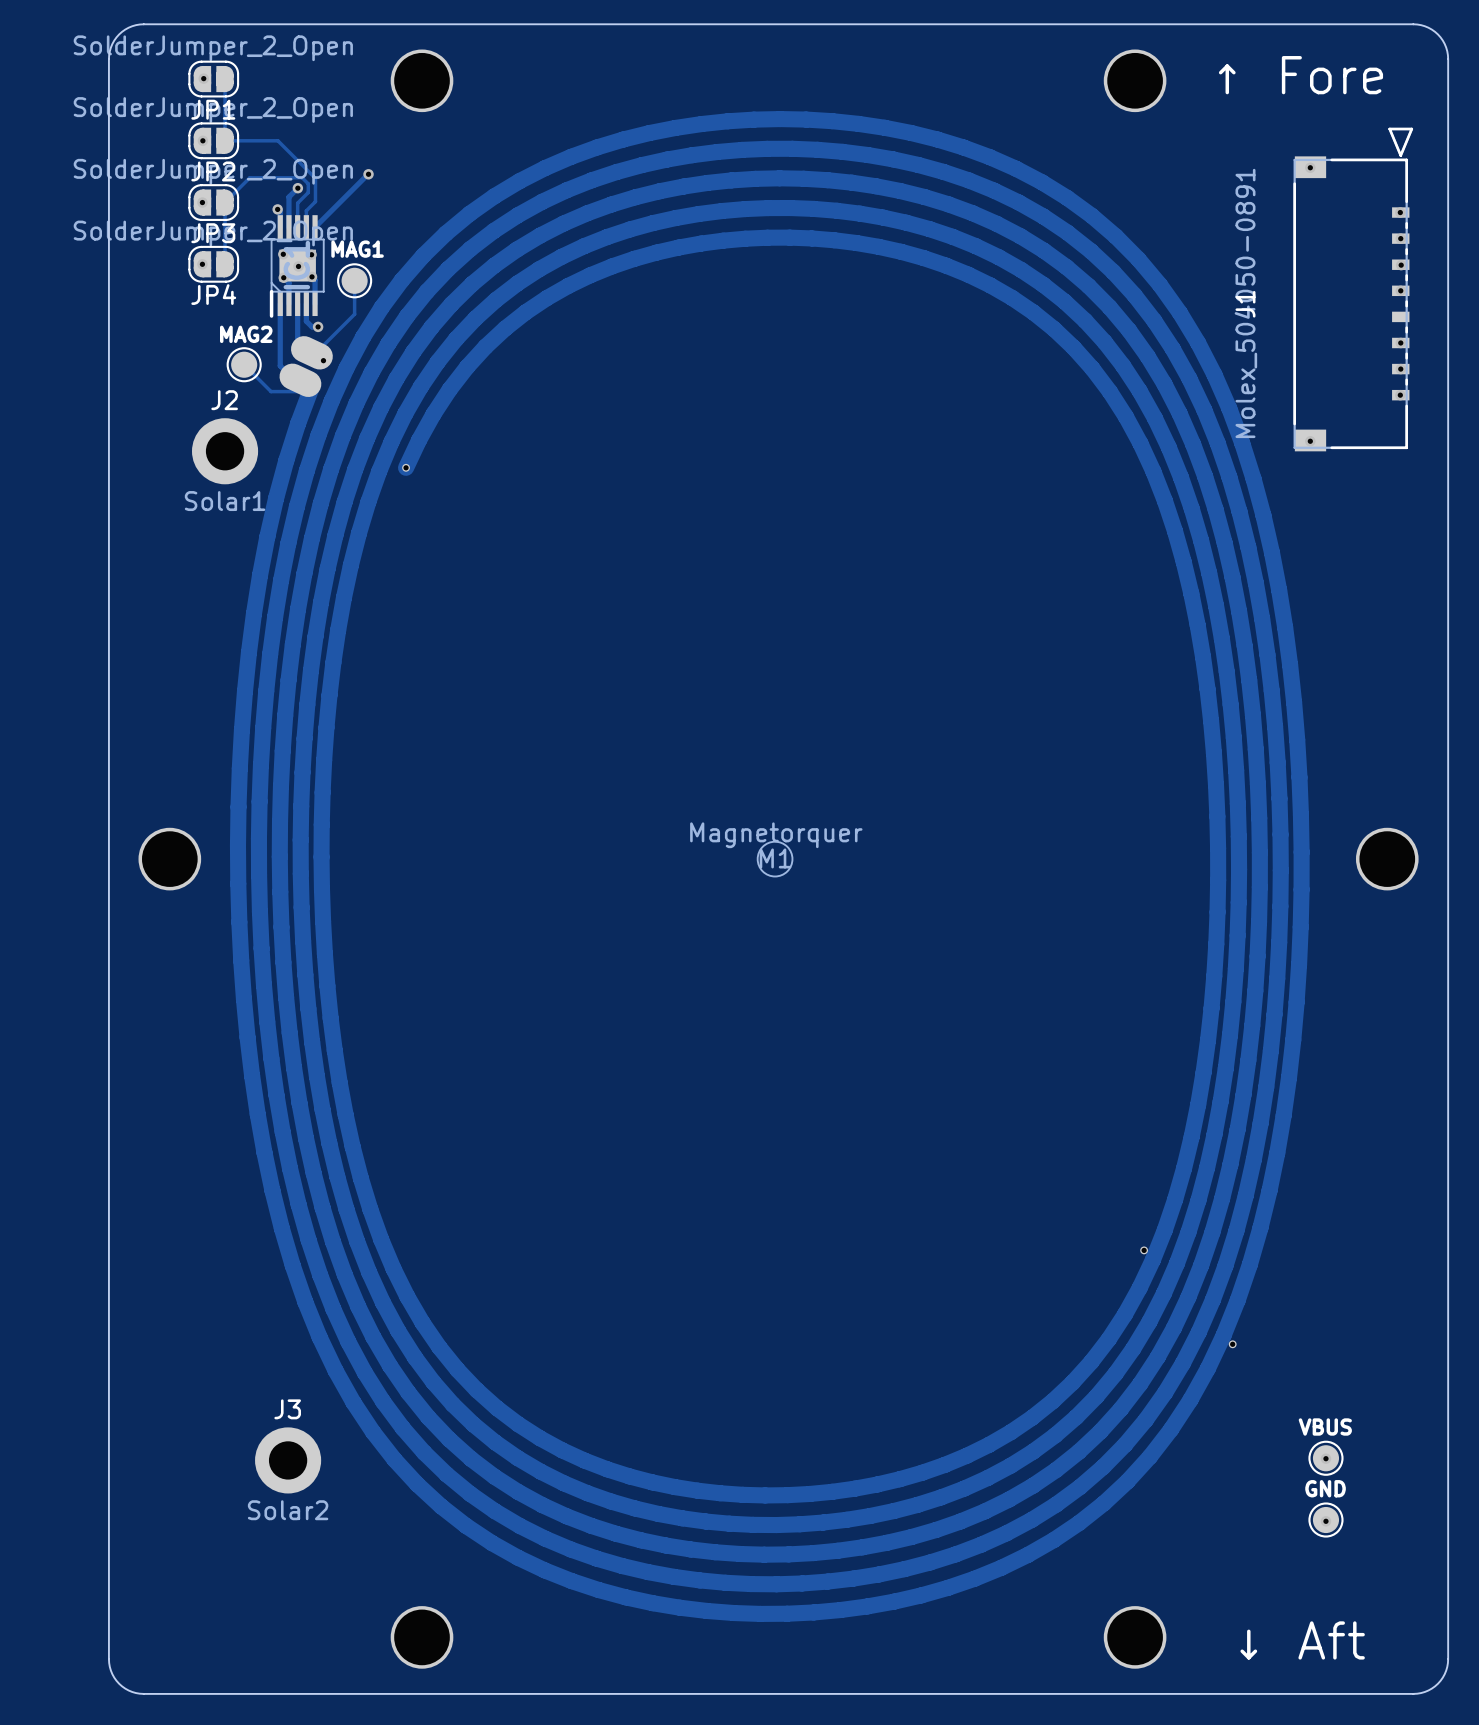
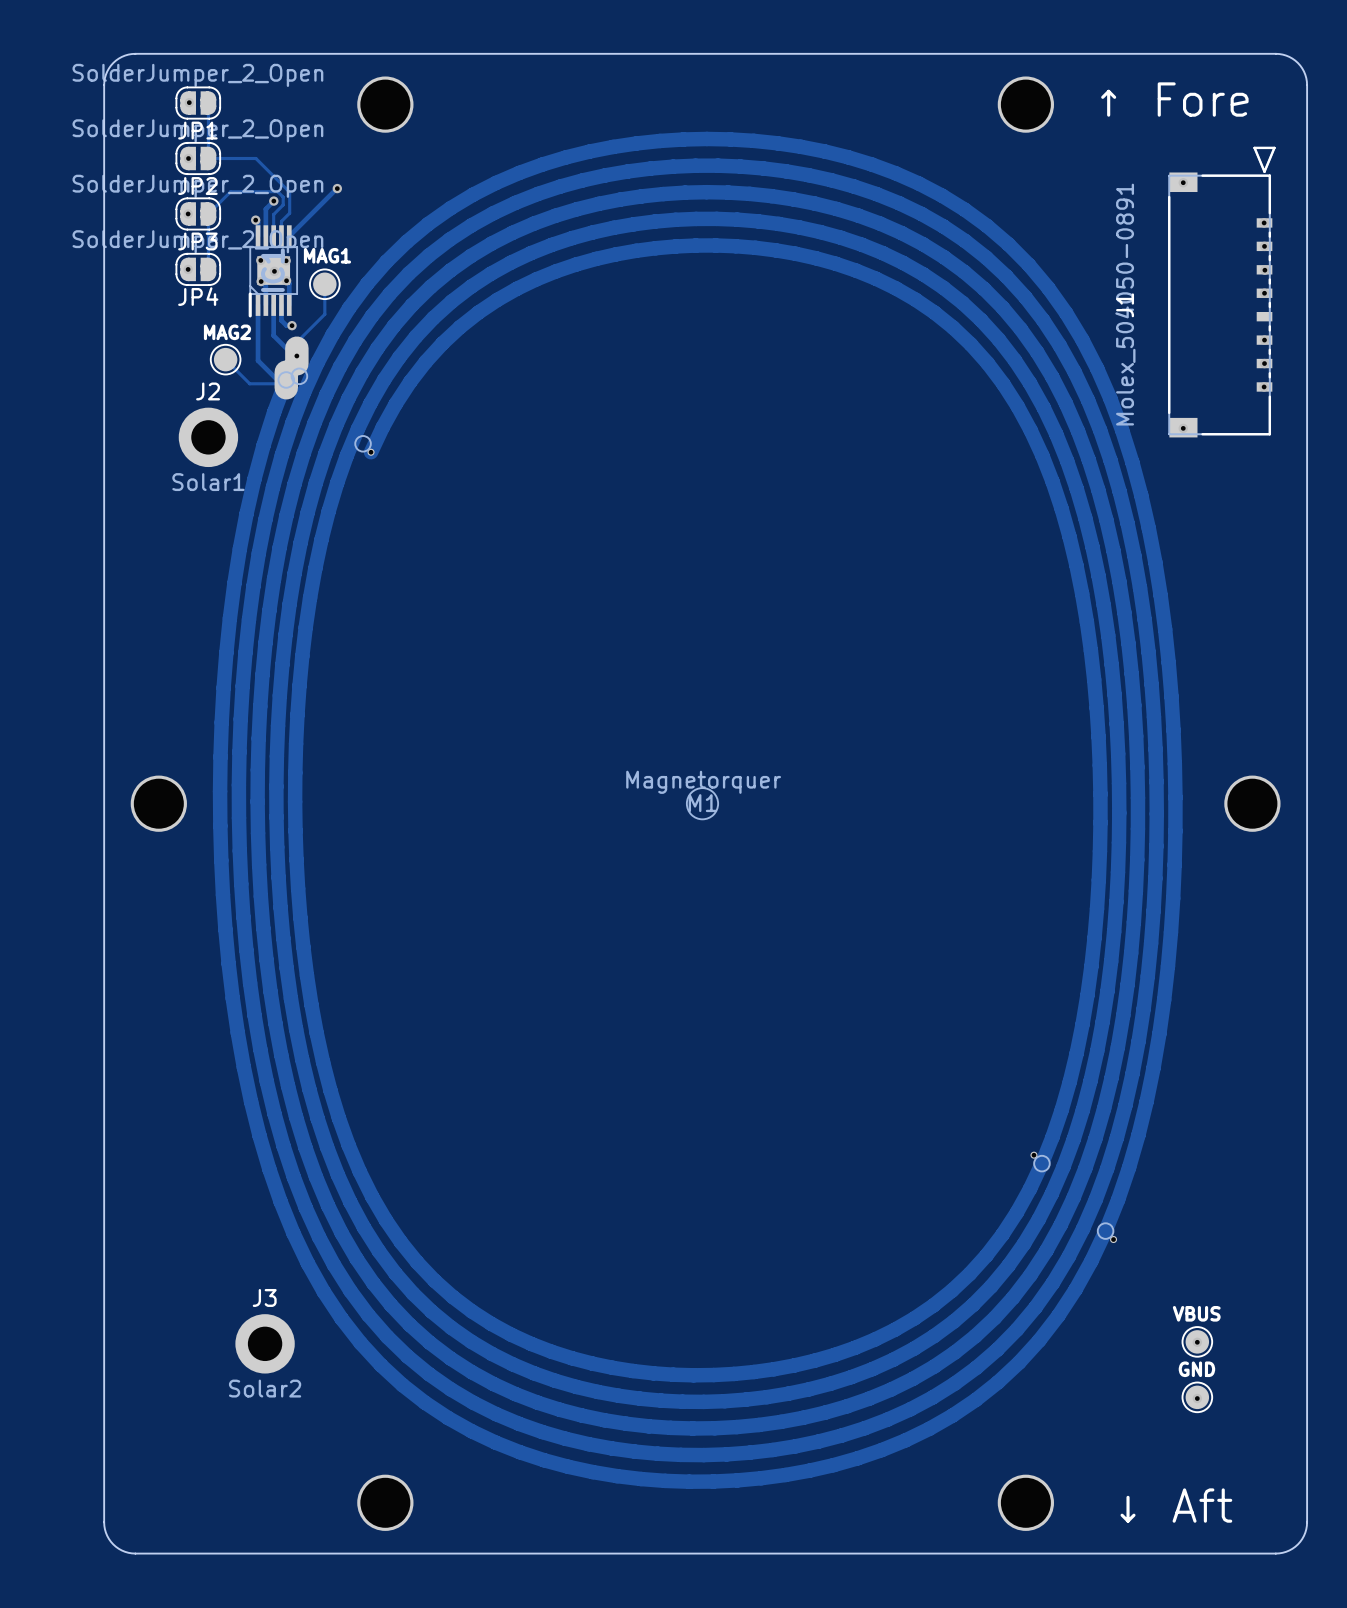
M1 footprint: [229, 111, 1310, 1622] -> [212, 131, 1183, 1489]

